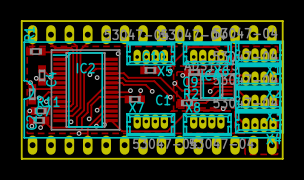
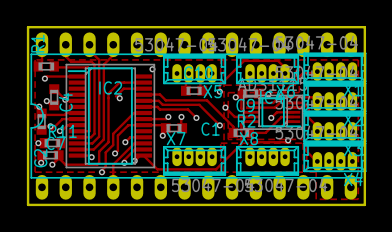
track: none -> (77, 76) (47, 76) (44, 78)
via: none -> (44, 78)
via: (89, 74) -> none
via: none -> (119, 98)
via: (97, 77) -> none
via: none -> (162, 135)

